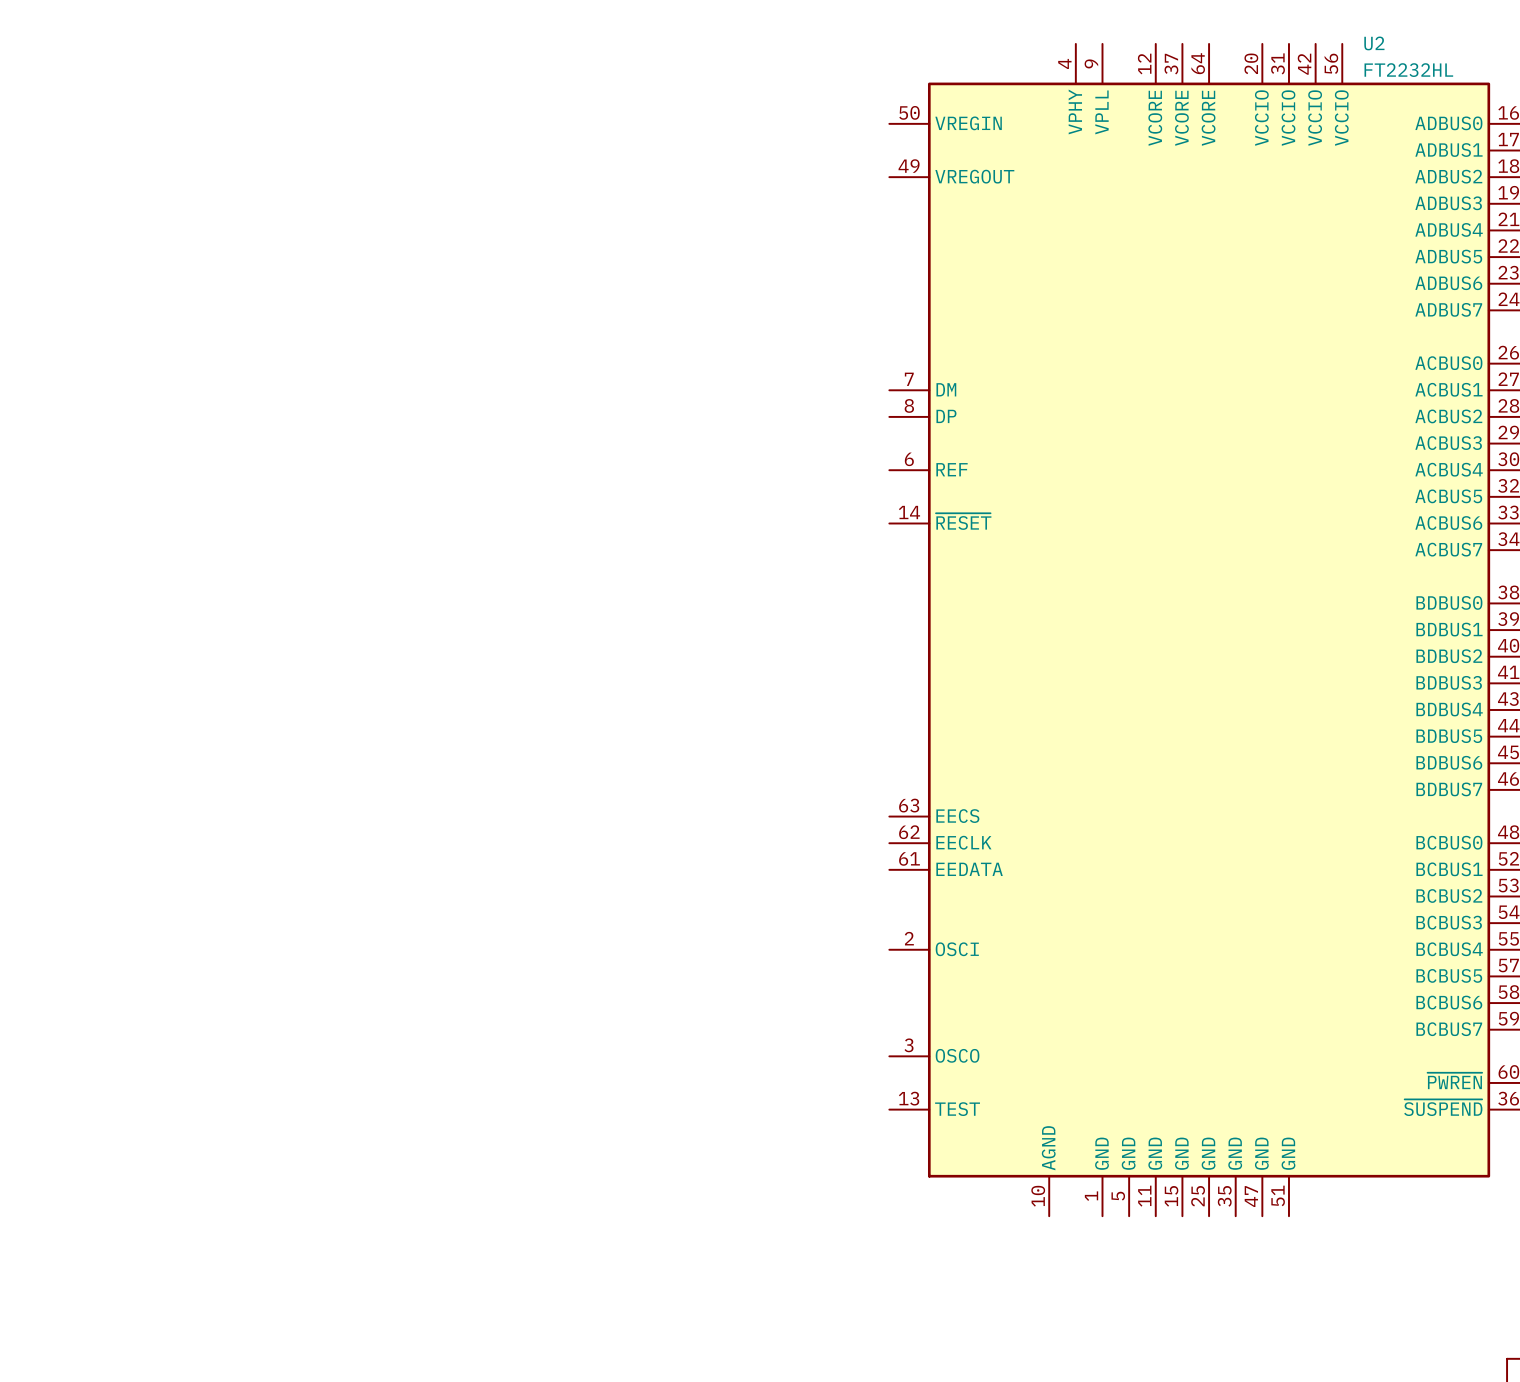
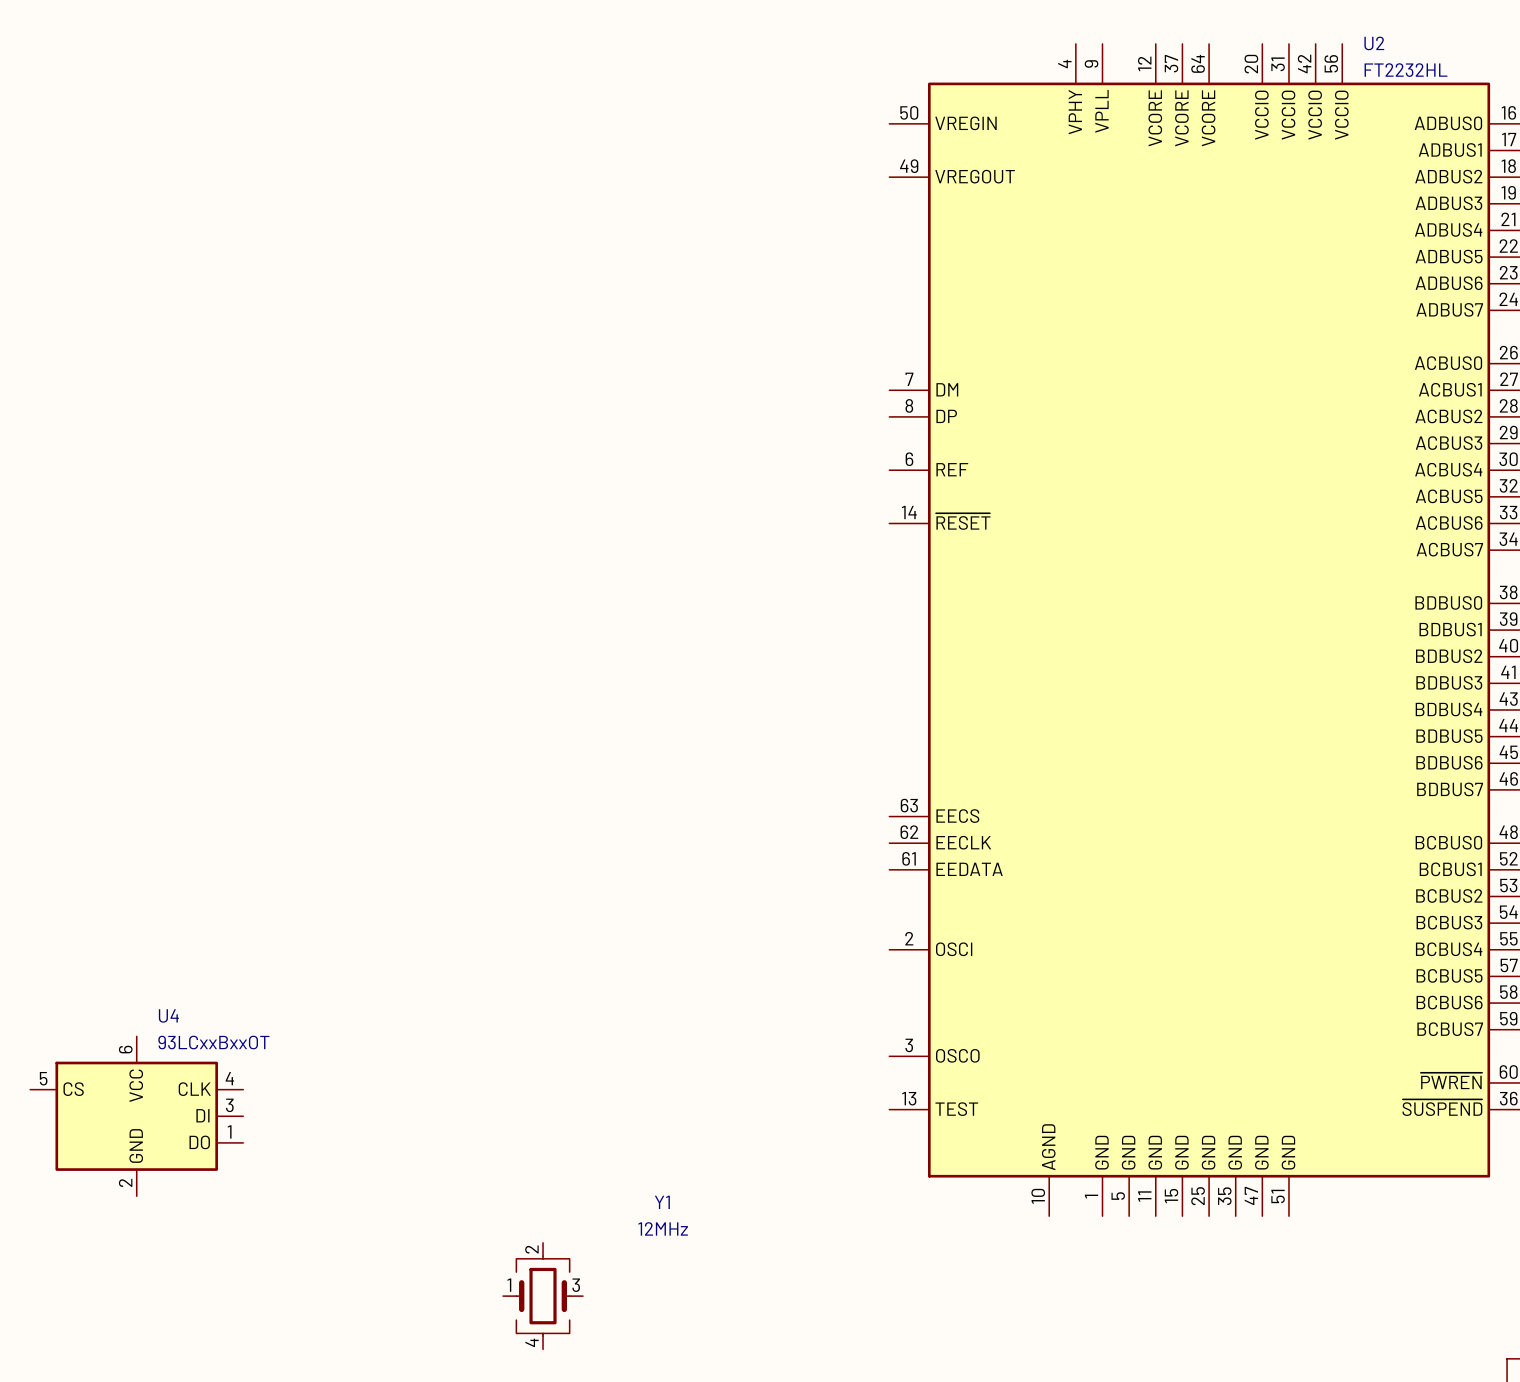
U4: none -> 93LCxxBxxOT (136, 1116)
Y1: none -> 12MHz (543, 1296)

